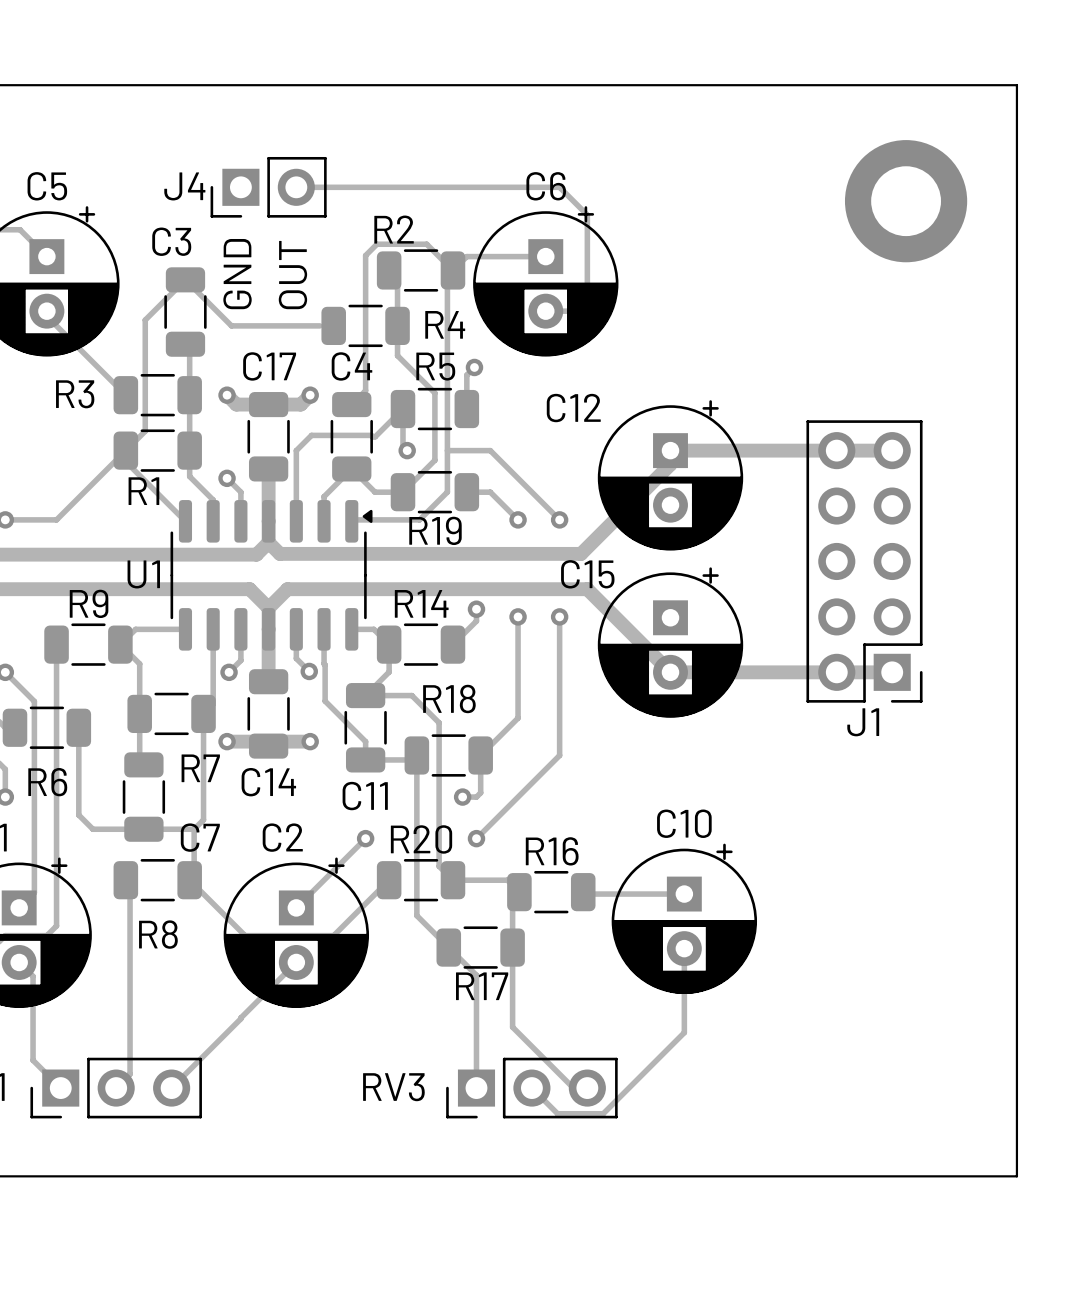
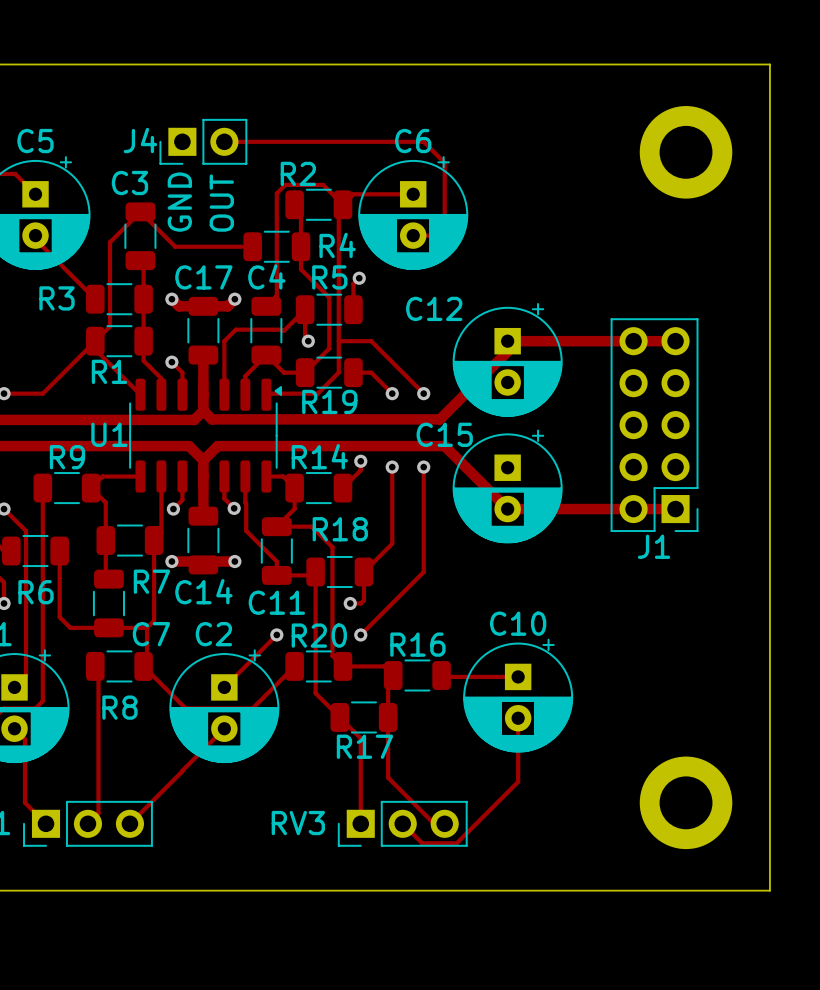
part: none -> (686, 802)

